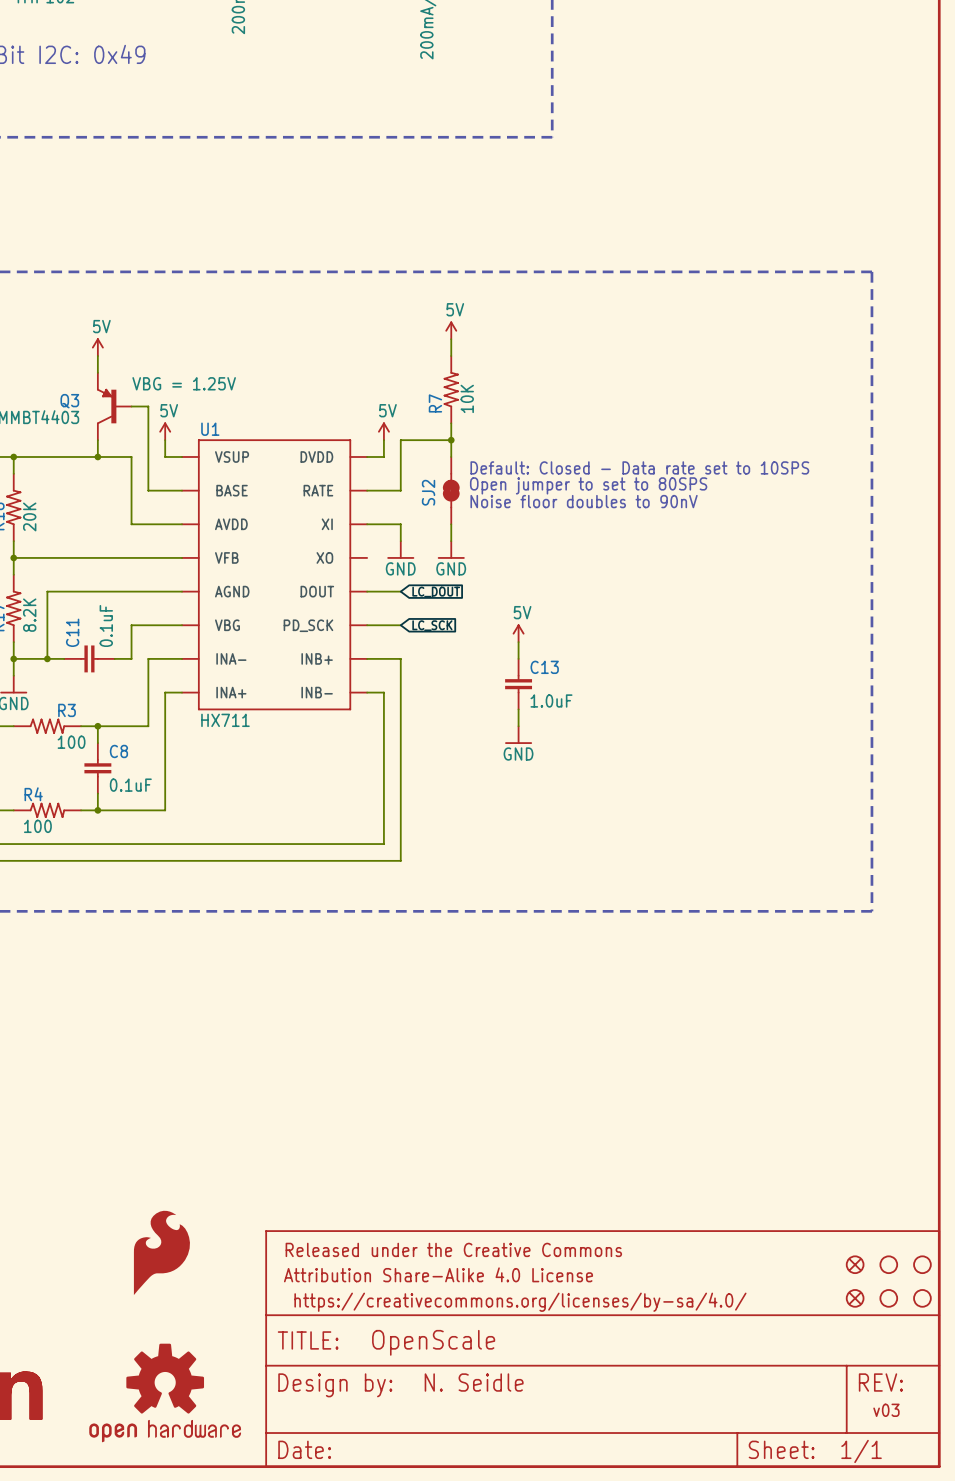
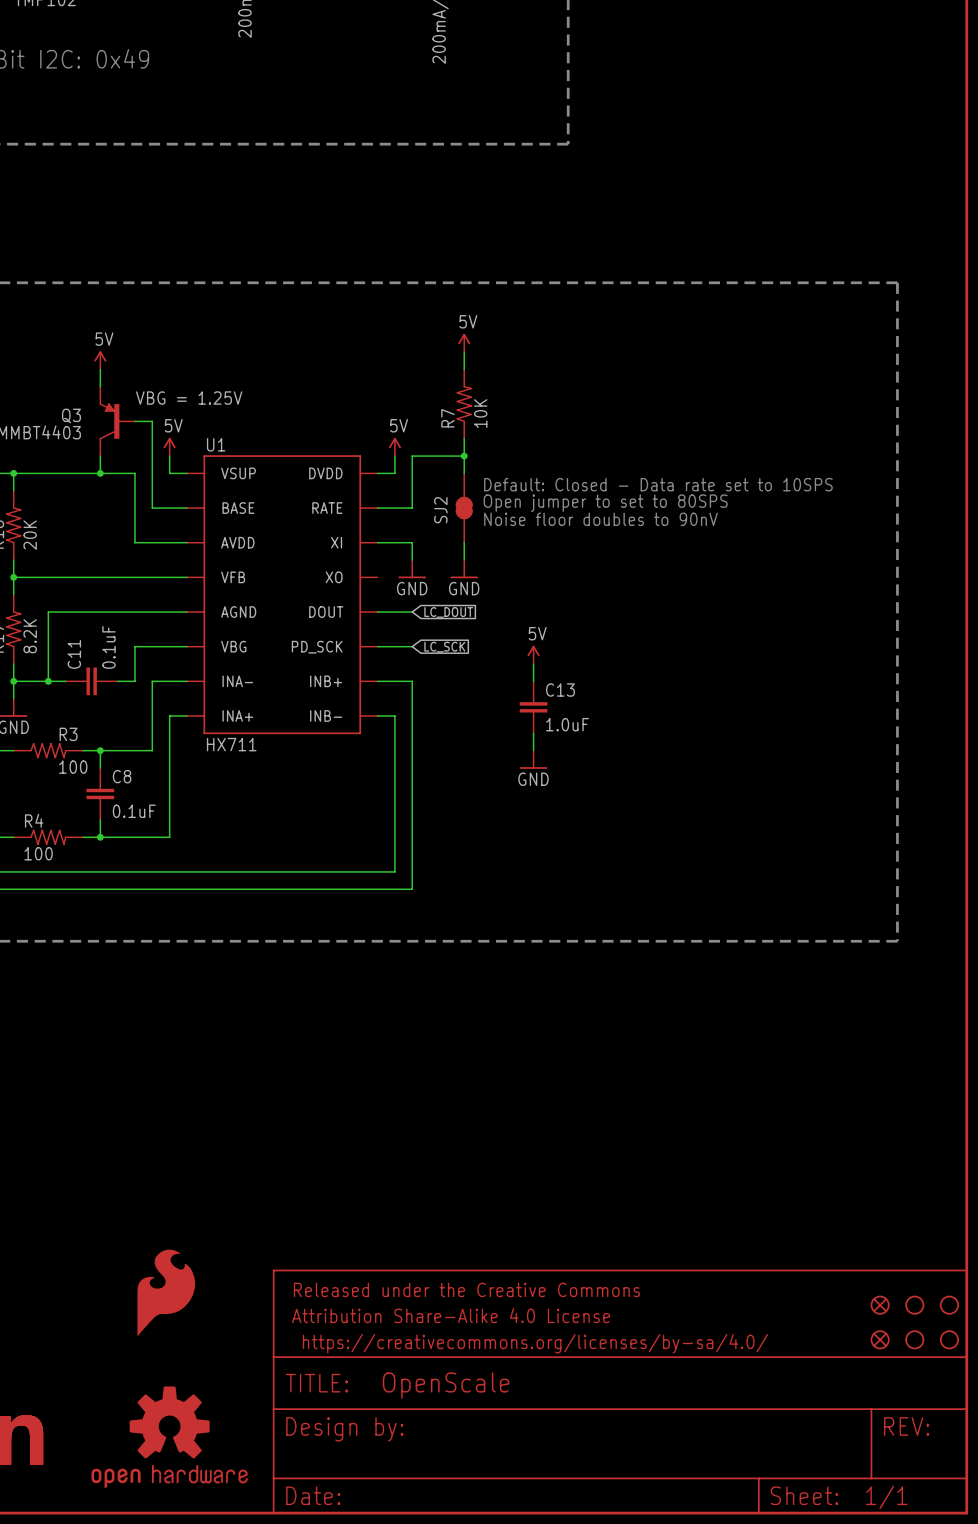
text: N. Seidle (474, 1382) -> none
text: v03 (886, 1410) -> none

